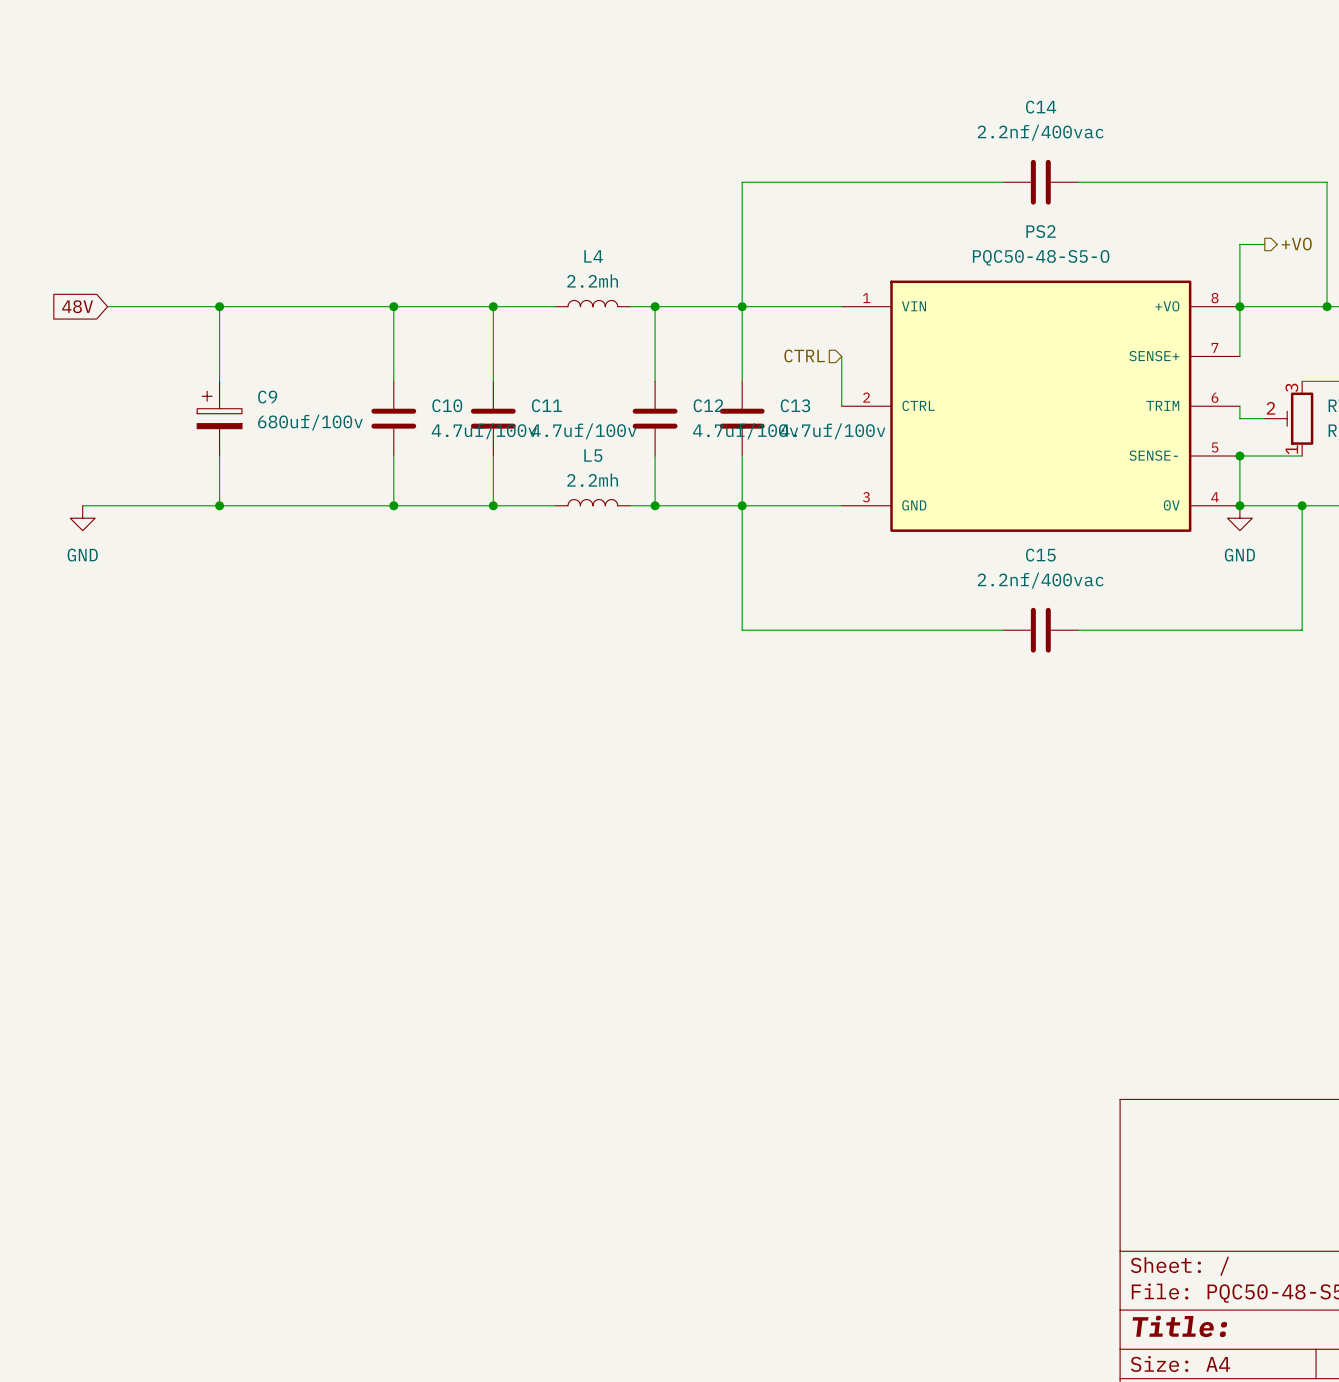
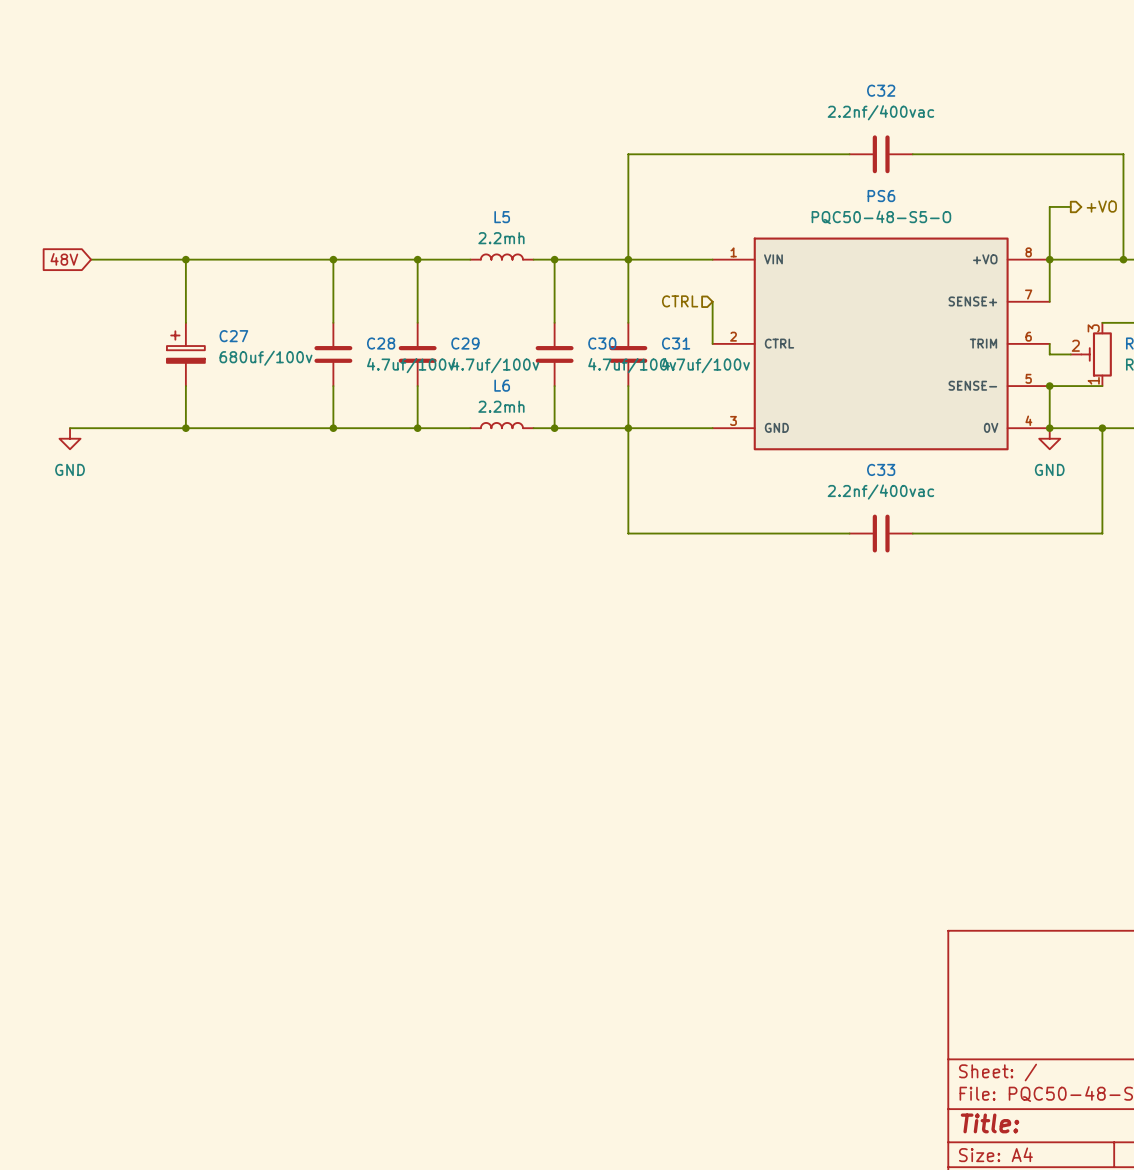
C14 name: C14 (1041, 107) -> C32 (881, 90)
PS2 name: PS2 (1041, 231) -> PS6 (881, 196)
L4 name: L4 (593, 256) -> L5 (502, 217)
C9 name: C9 (267, 397) -> C27 (233, 336)
C10 name: C10 (447, 405) -> C28 (381, 343)
C11 name: C11 (546, 405) -> C29 (465, 343)
C12 name: C12 (708, 405) -> C30 (602, 343)
C13 name: C13 (795, 405) -> C31 (676, 343)
L5 name: L5 (593, 455) -> L6 (502, 385)
C15 name: C15 (1040, 555) -> C33 (881, 469)

